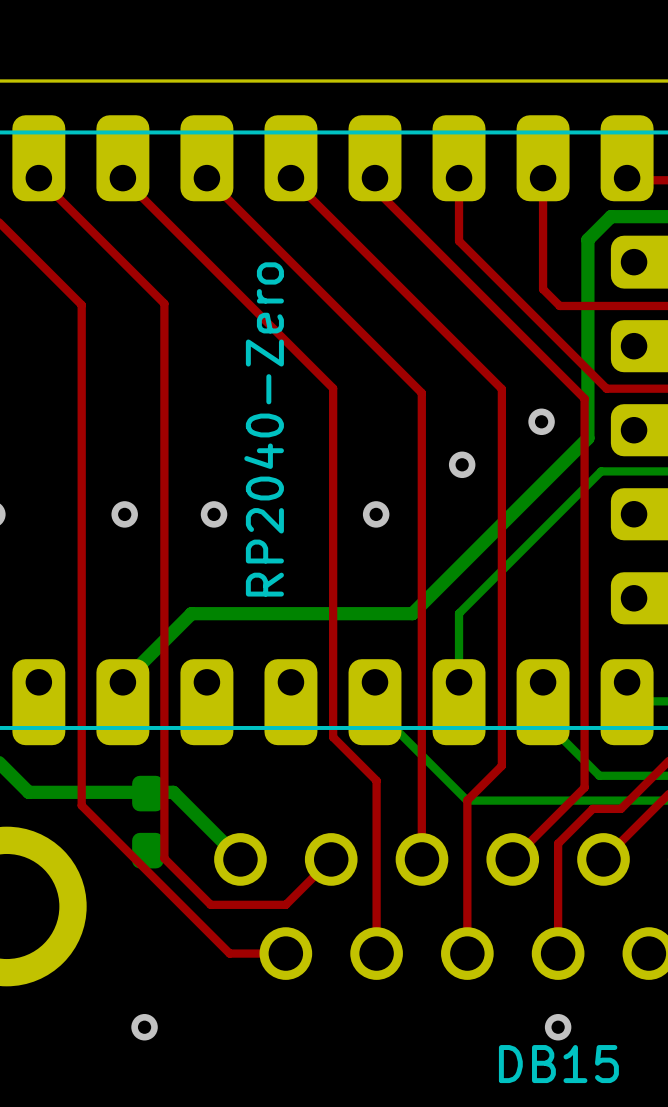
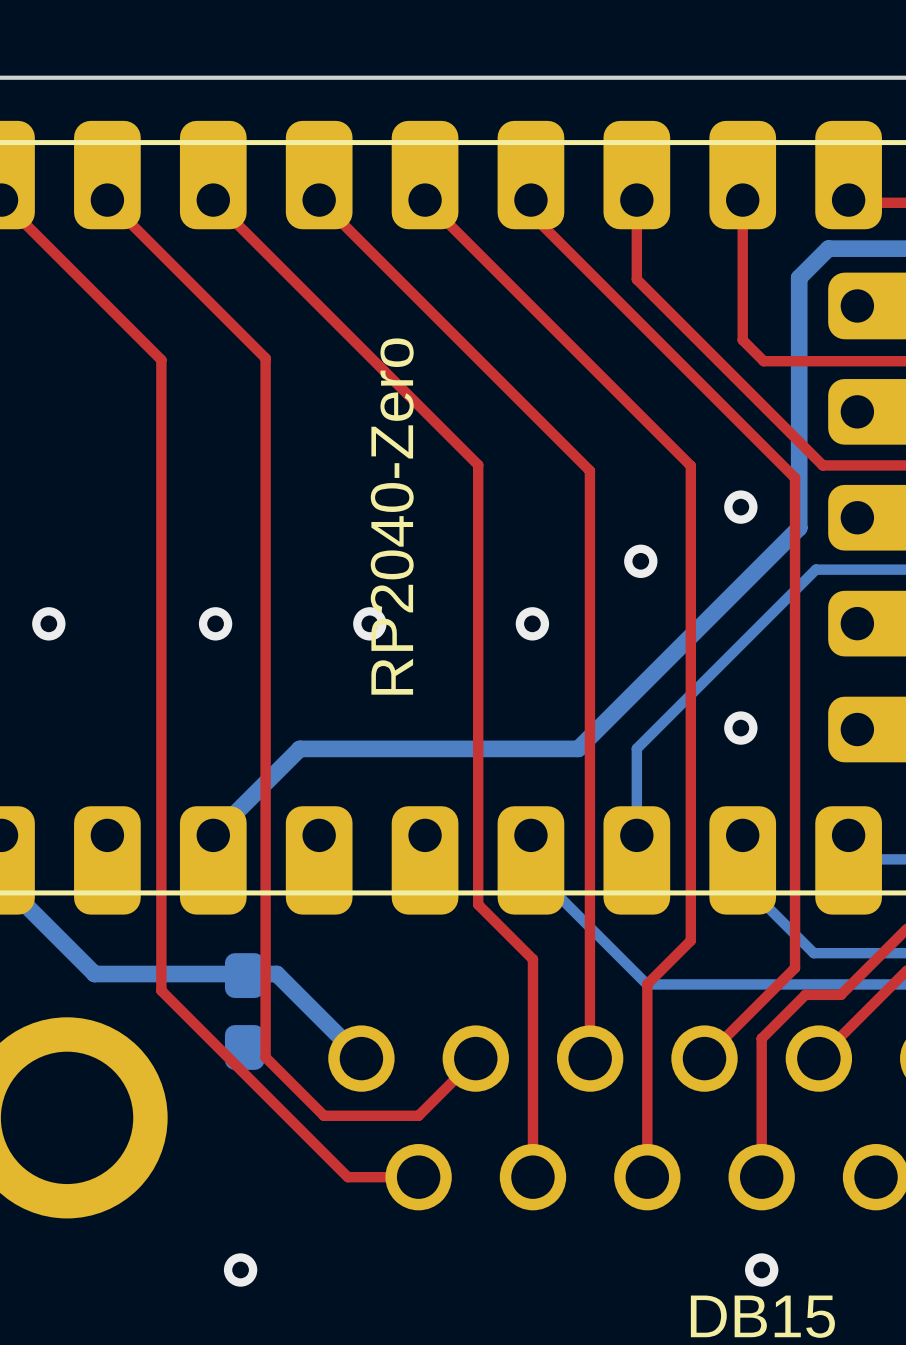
via position: (214, 514) -> (369, 623)
via: none -> (740, 728)

